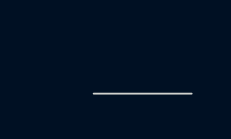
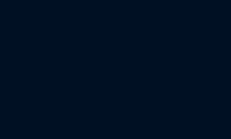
board edge: (93, 93) (191, 93) -> none

